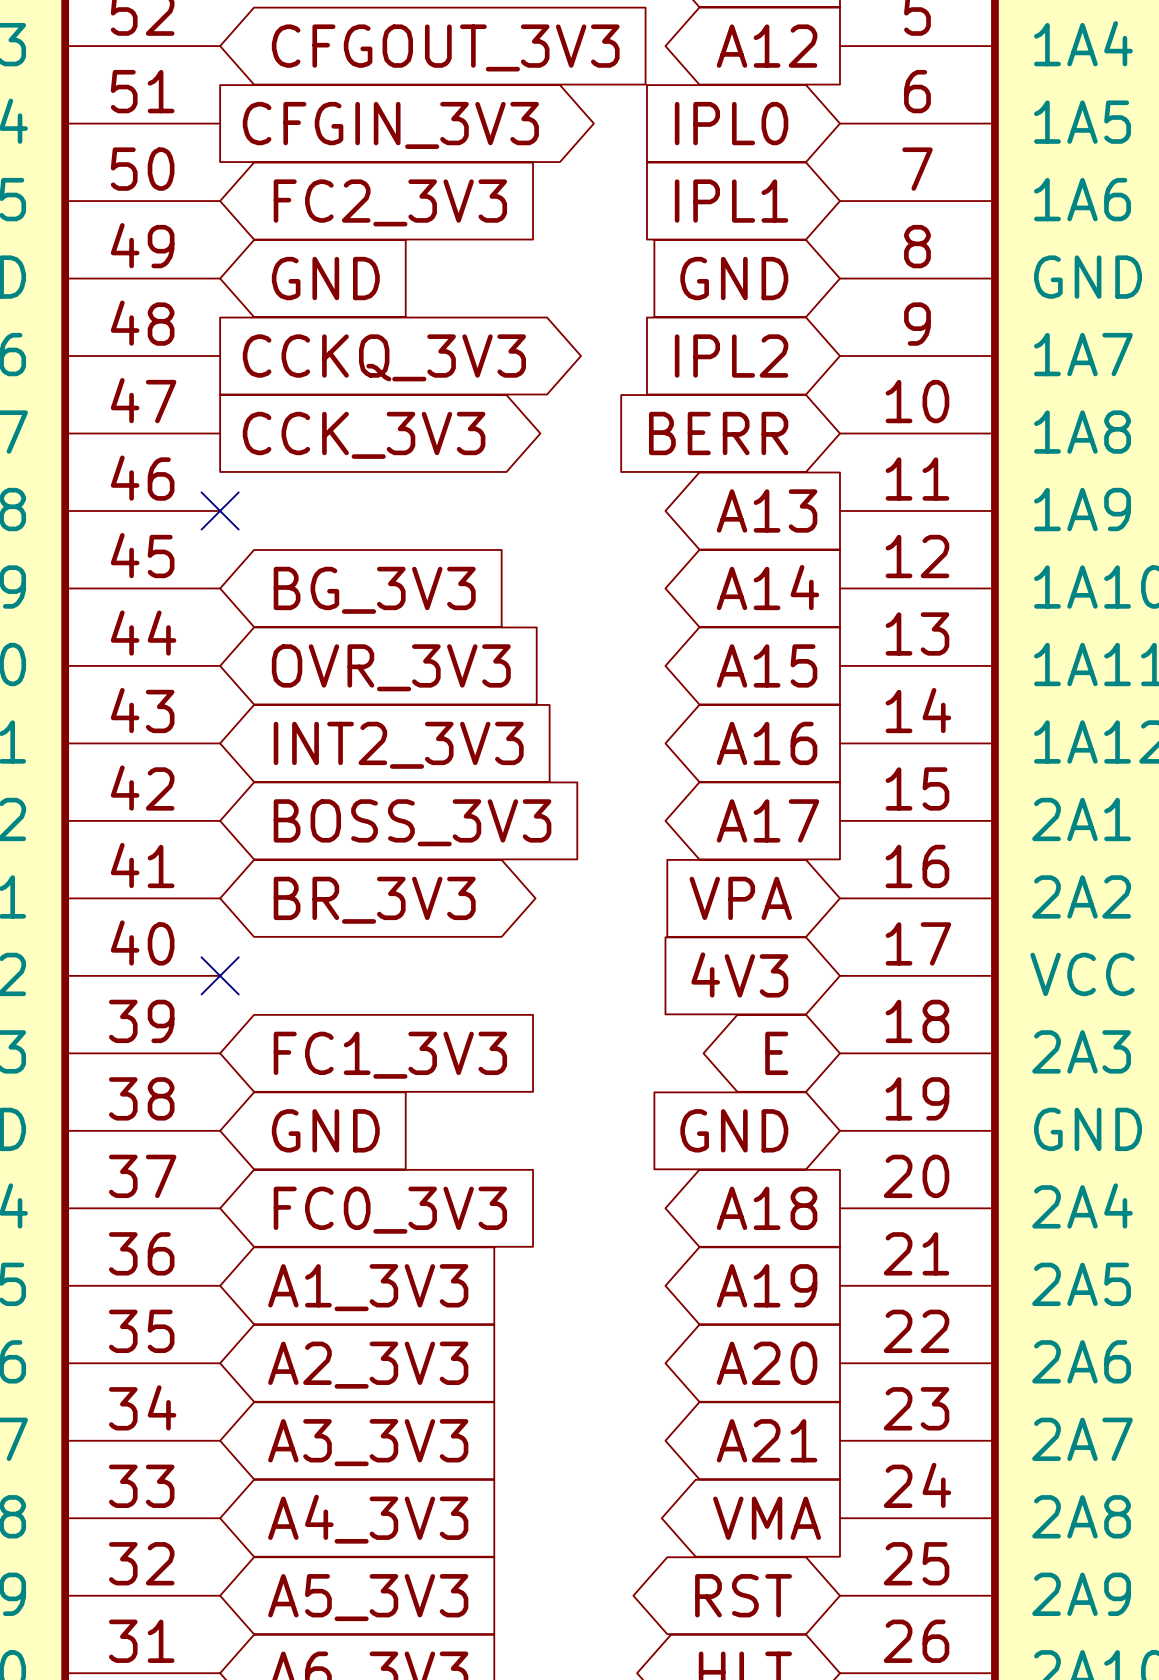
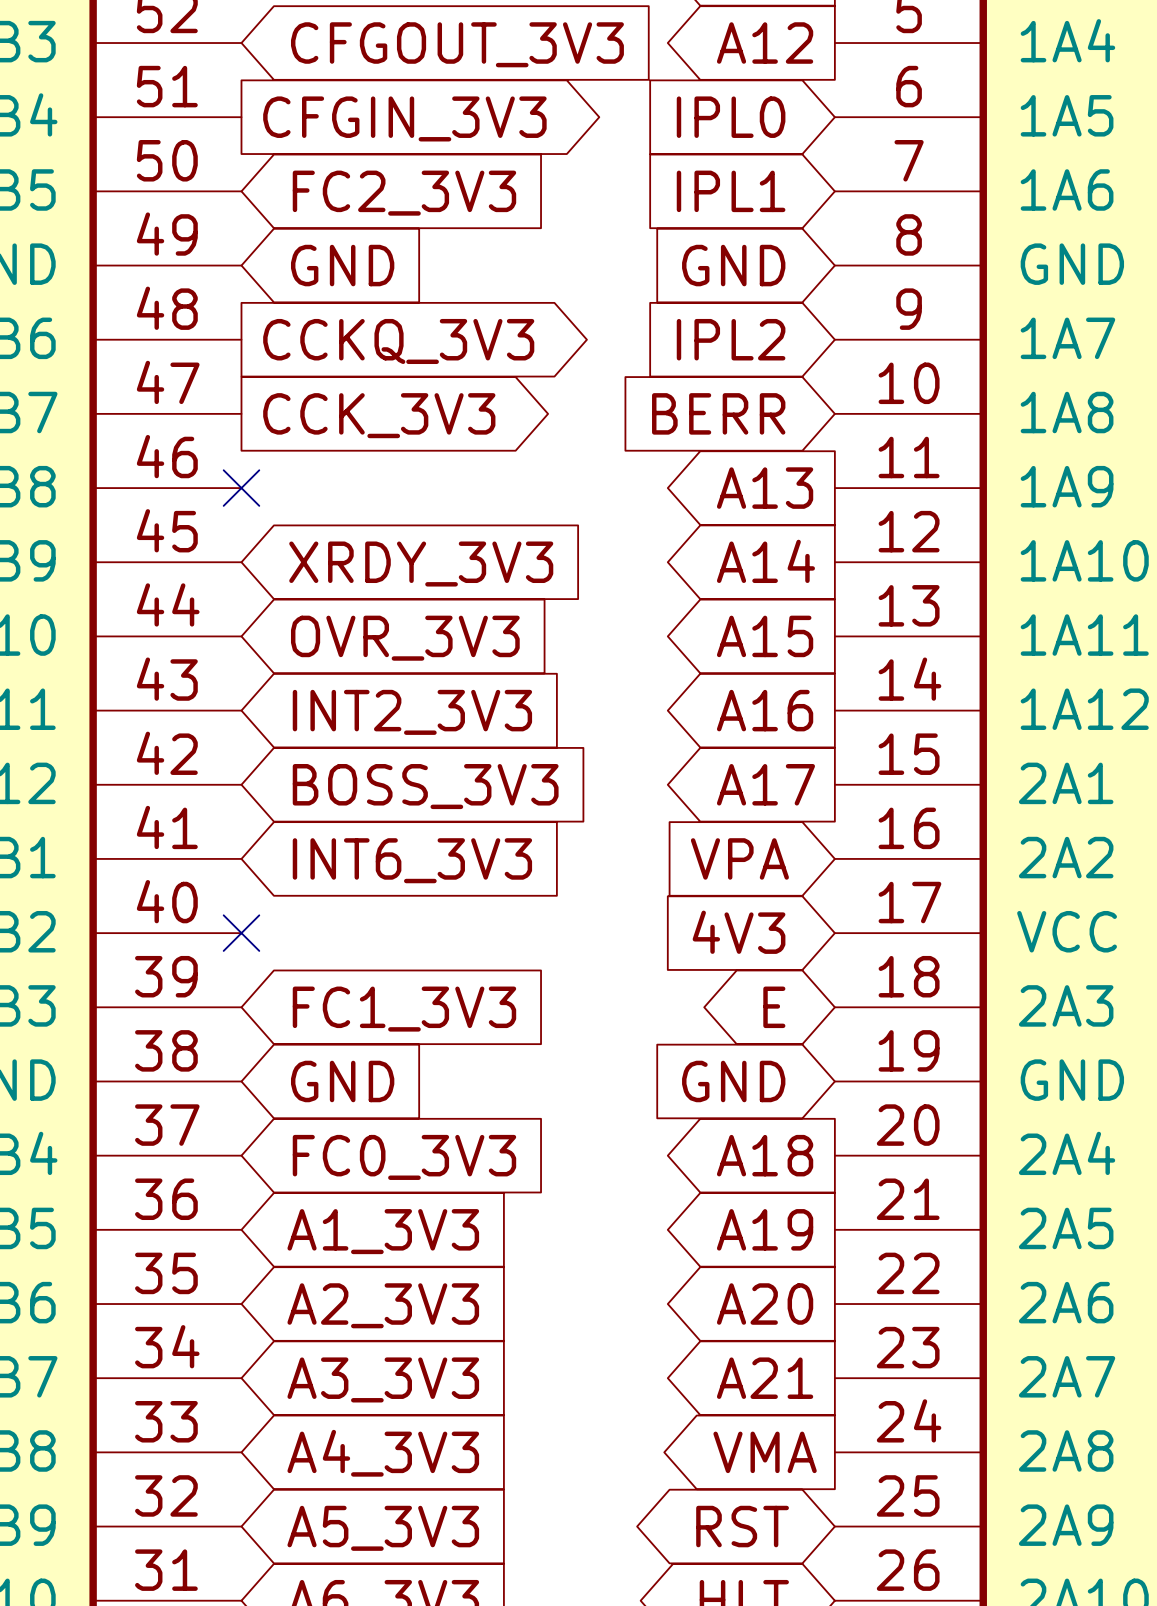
global label: BG_3V3 (374, 590) -> XRDY_3V3 (421, 564)
global label shape: bidirectional (374, 900) -> input (412, 860)
global label: BR_3V3 (374, 900) -> INT6_3V3 (412, 860)

